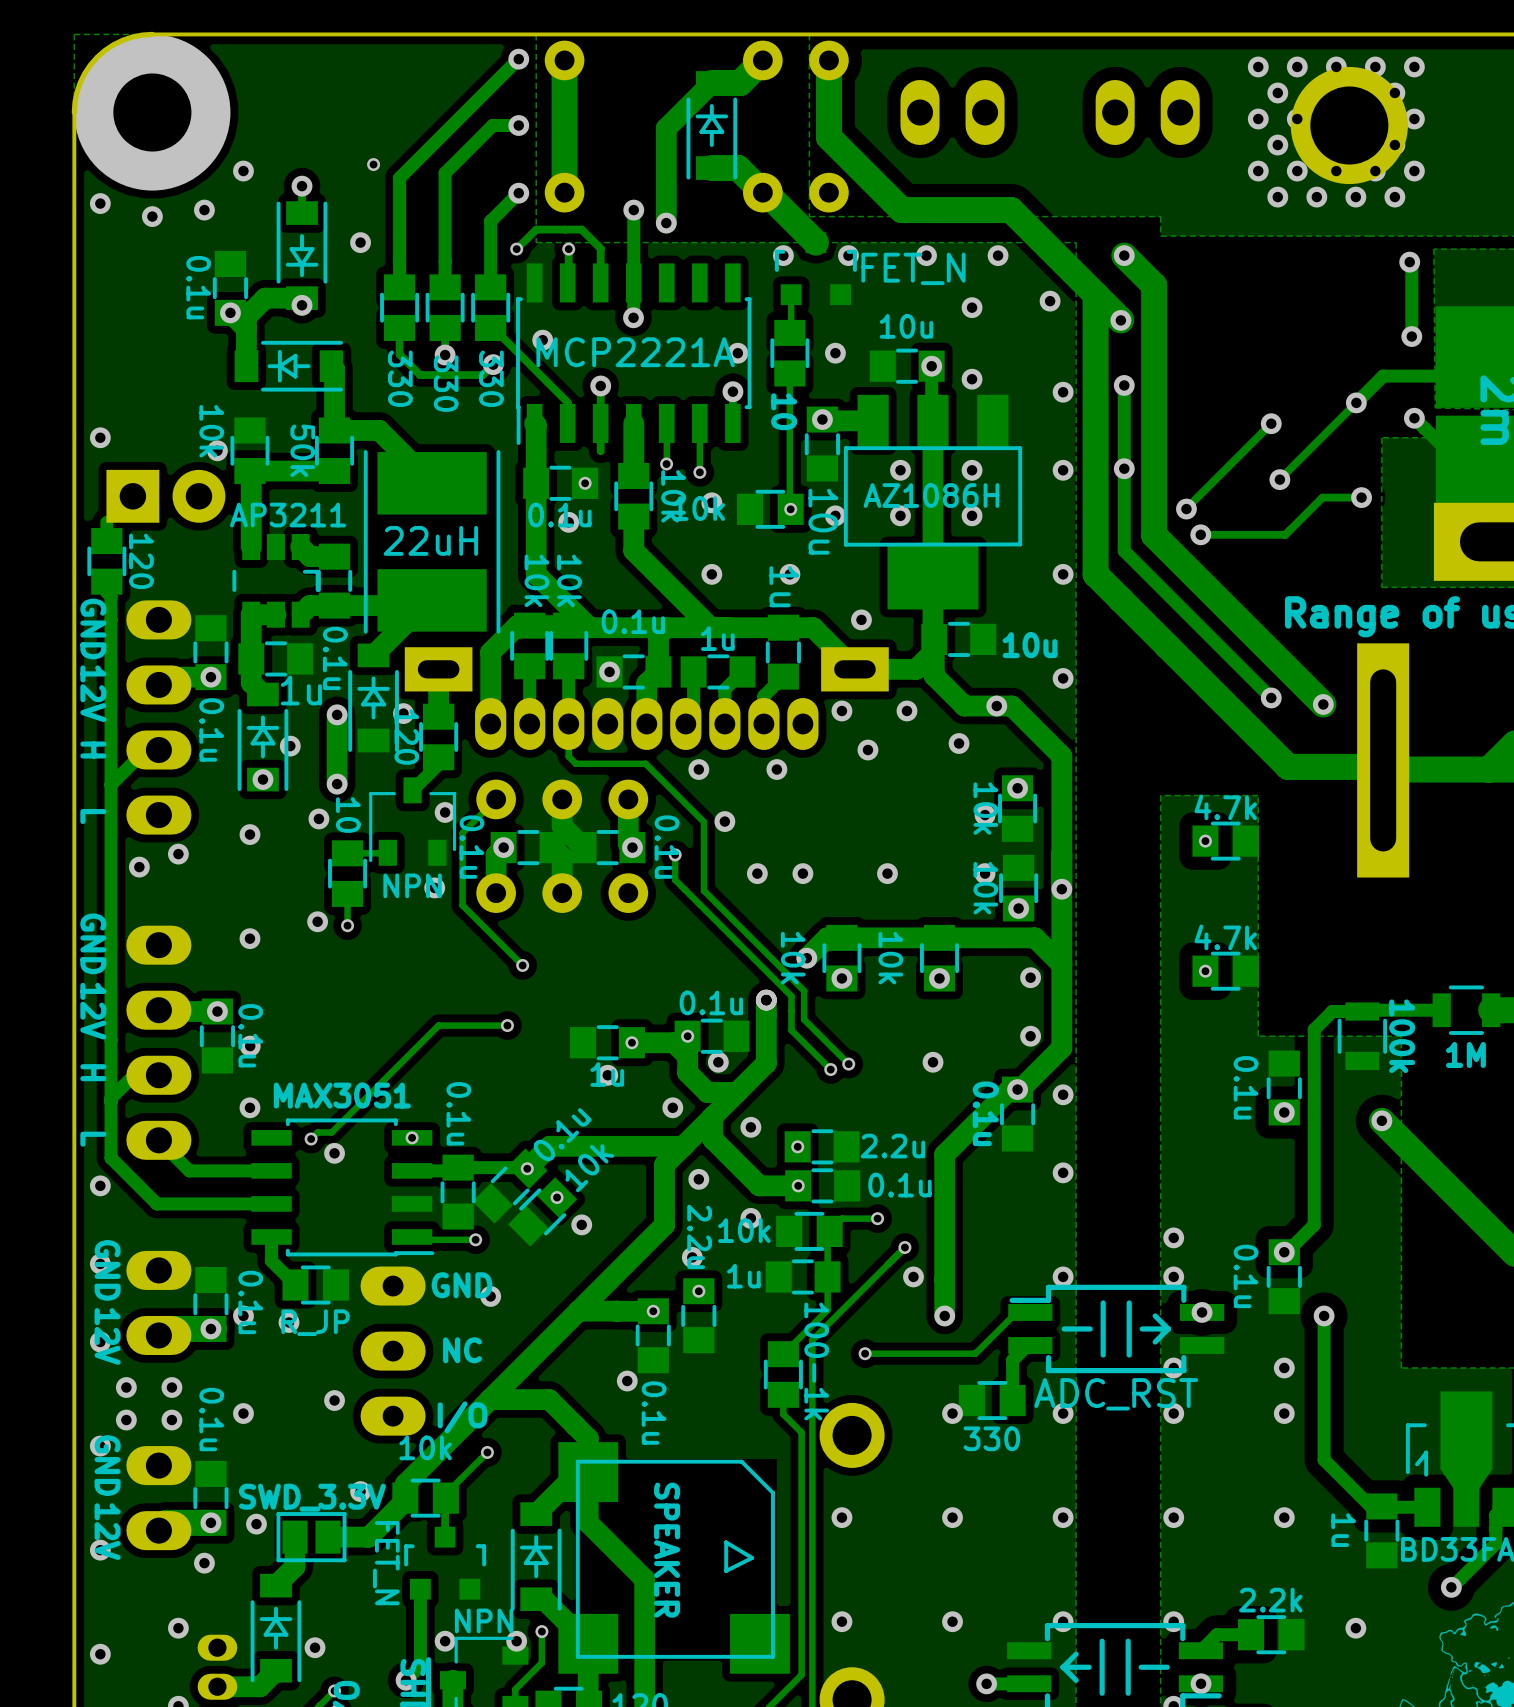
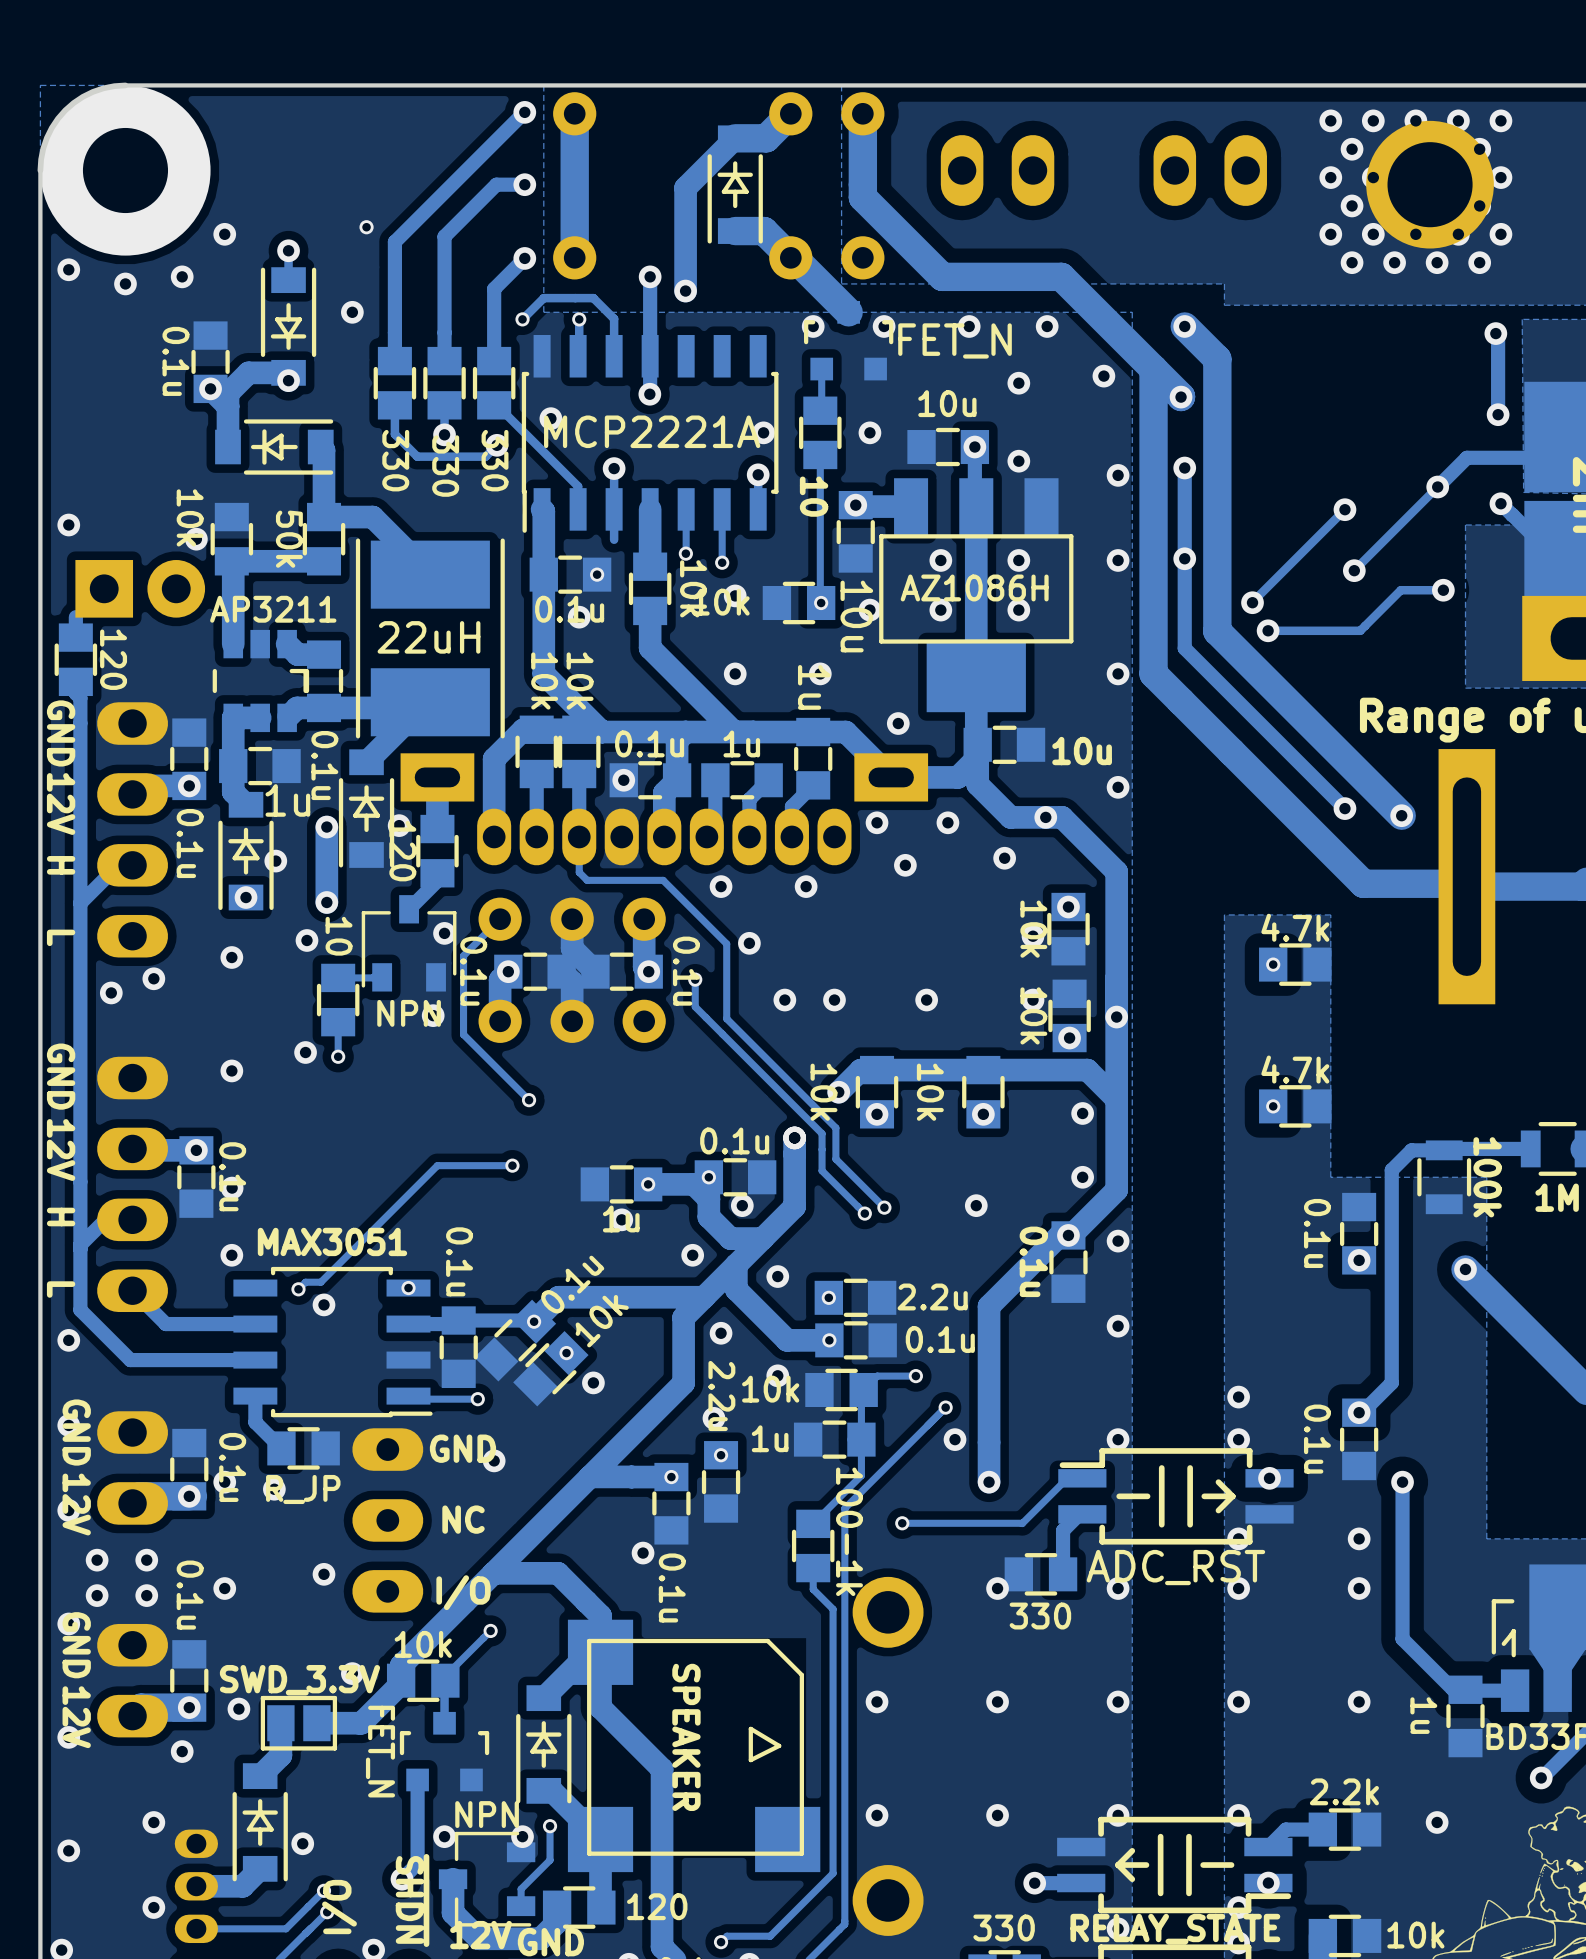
part value position: 0.1u (633, 621) -> 0.1u (649, 743)
part value position: 10k (425, 1447) -> 10k (423, 1644)

